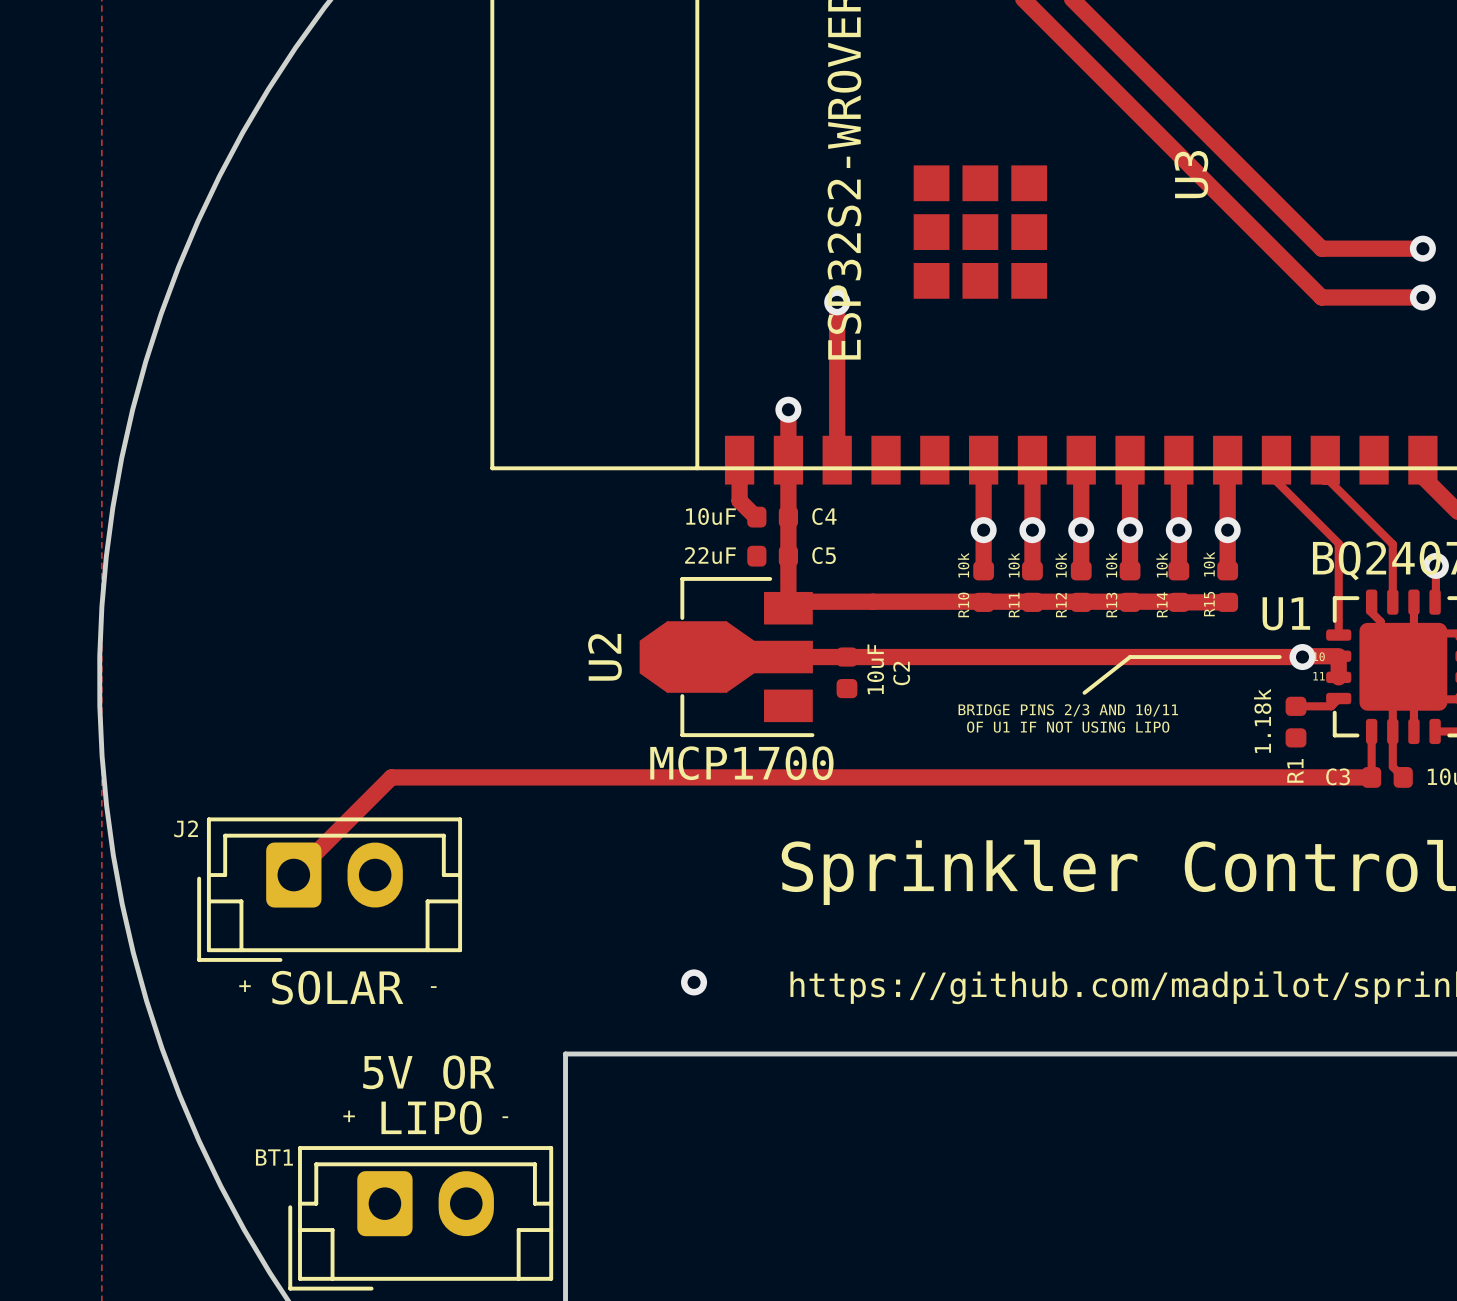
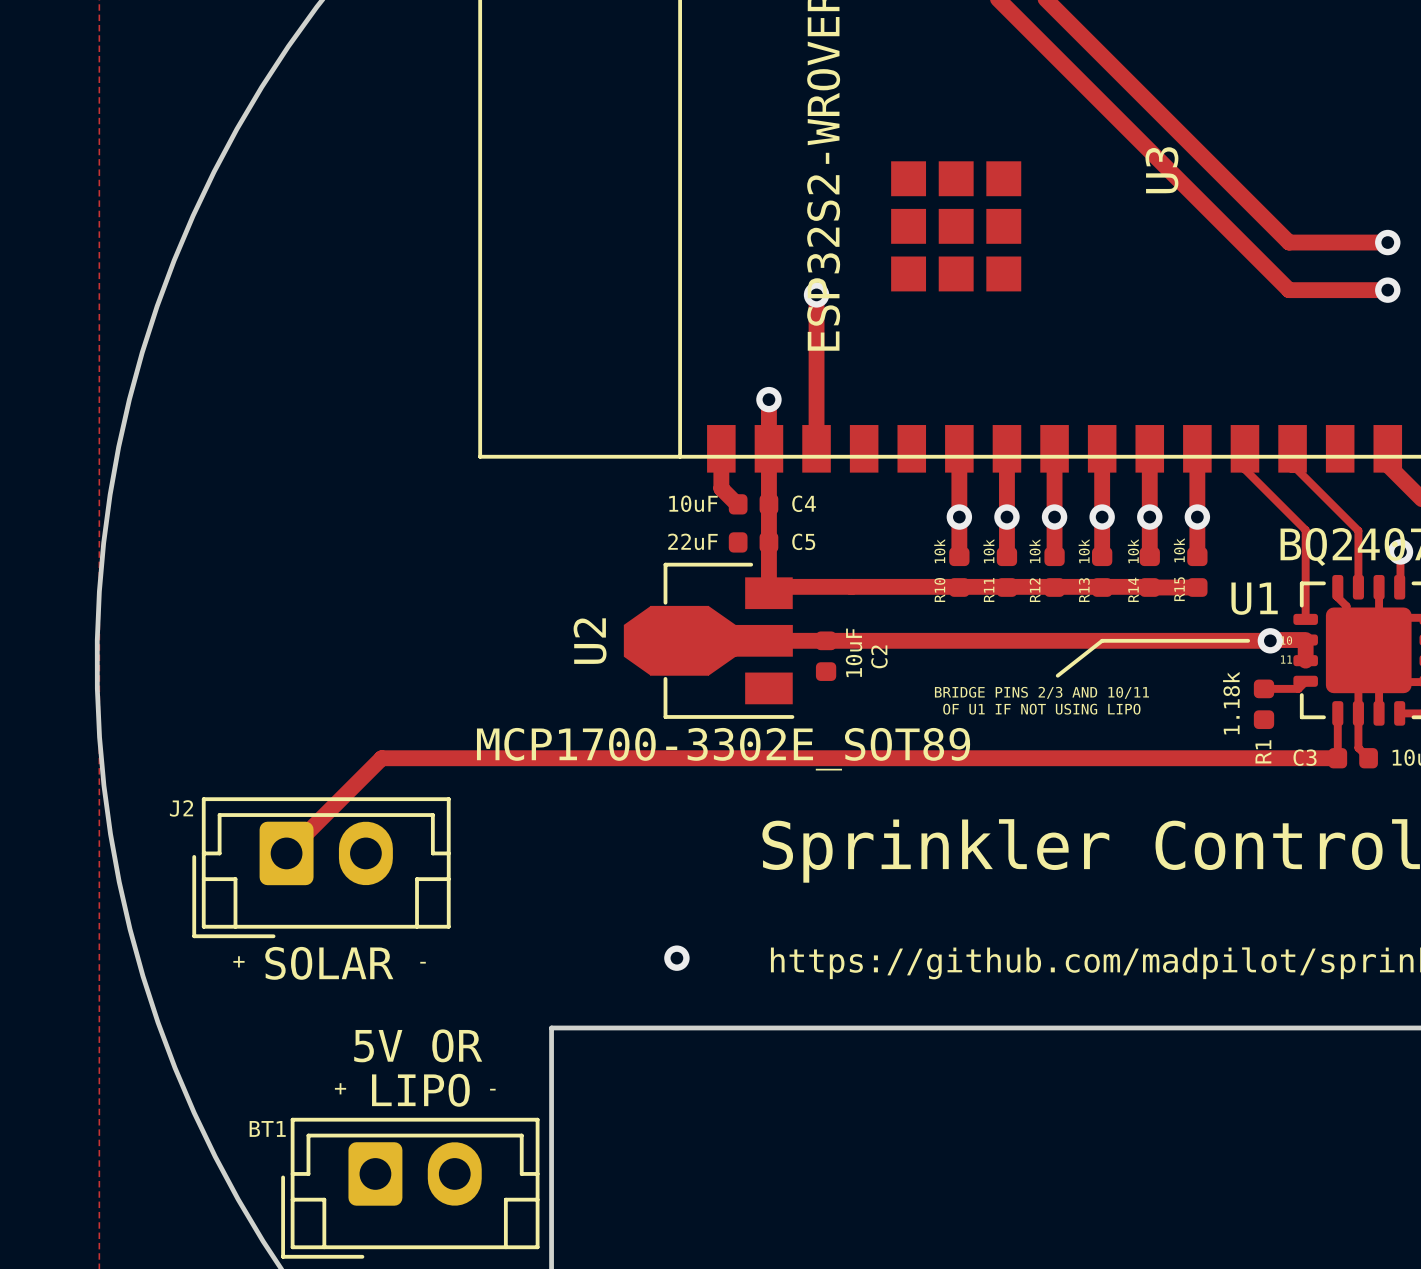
U2 value: MCP1700 (741, 763) -> MCP1700-3302E_SOT89 (723, 749)

